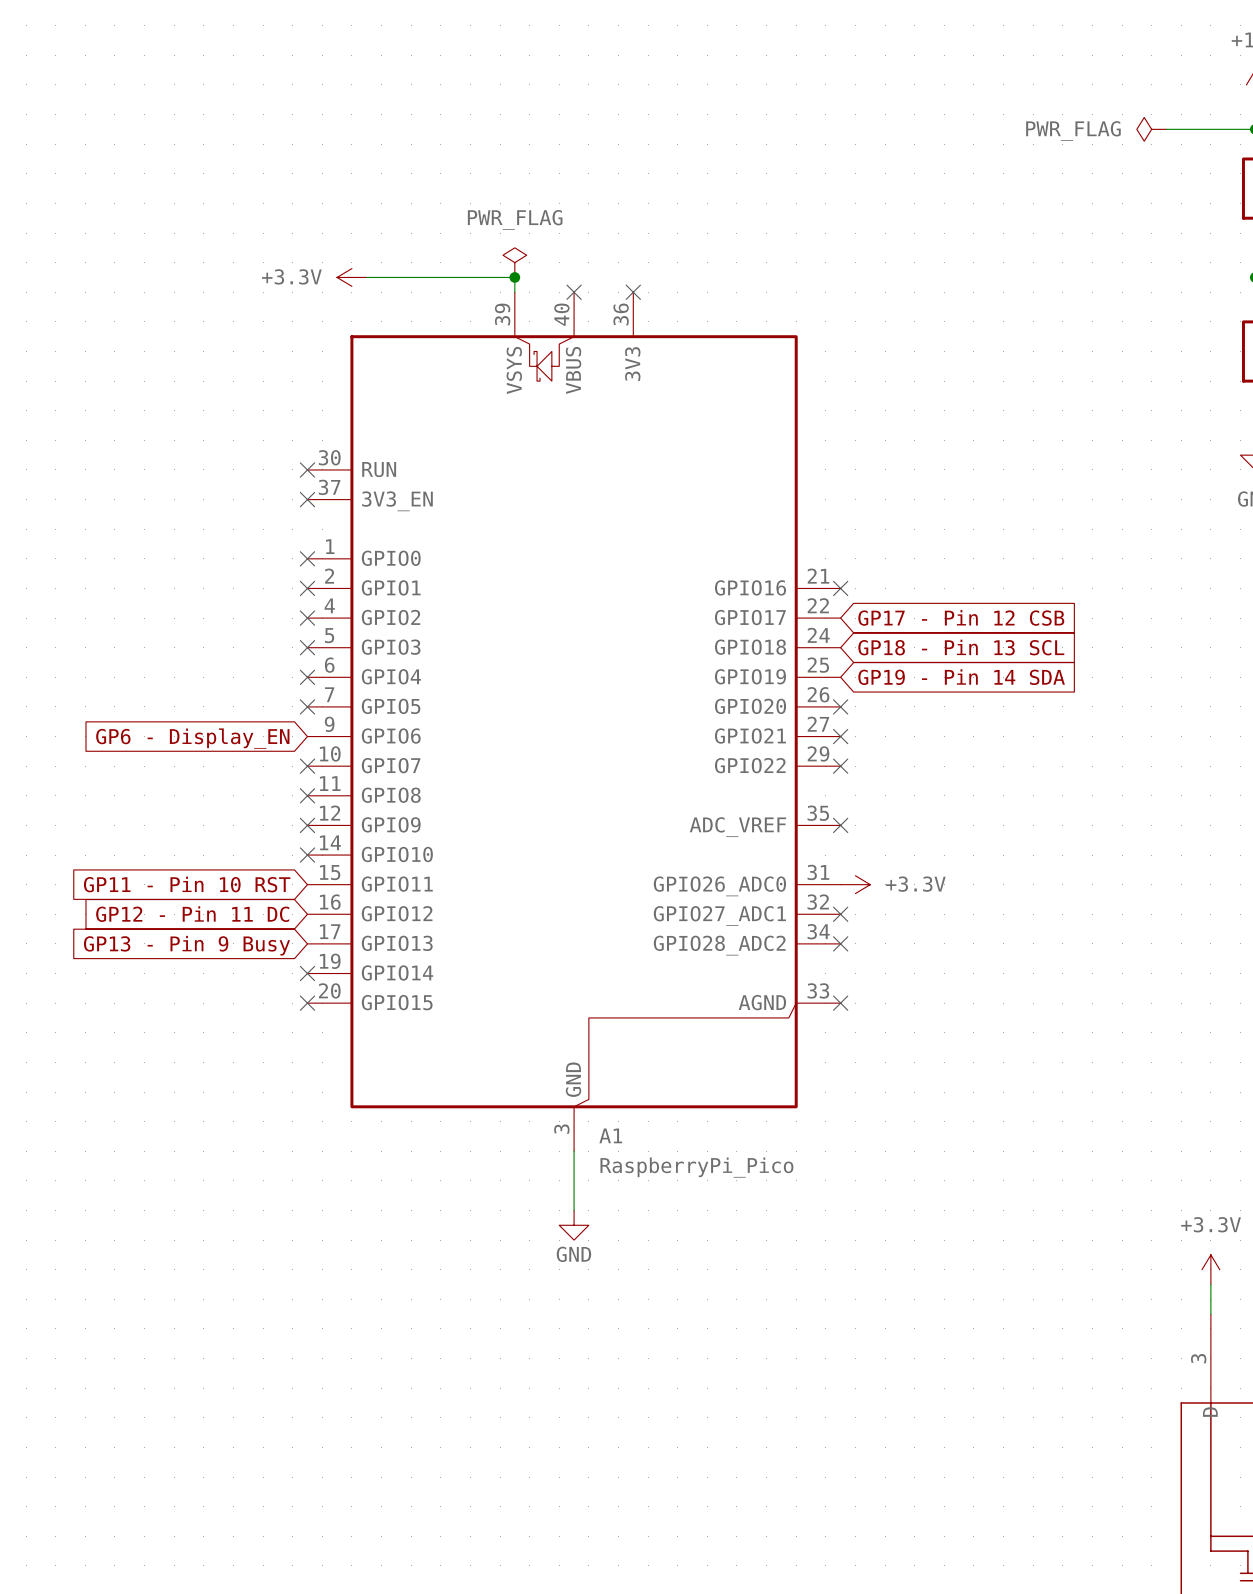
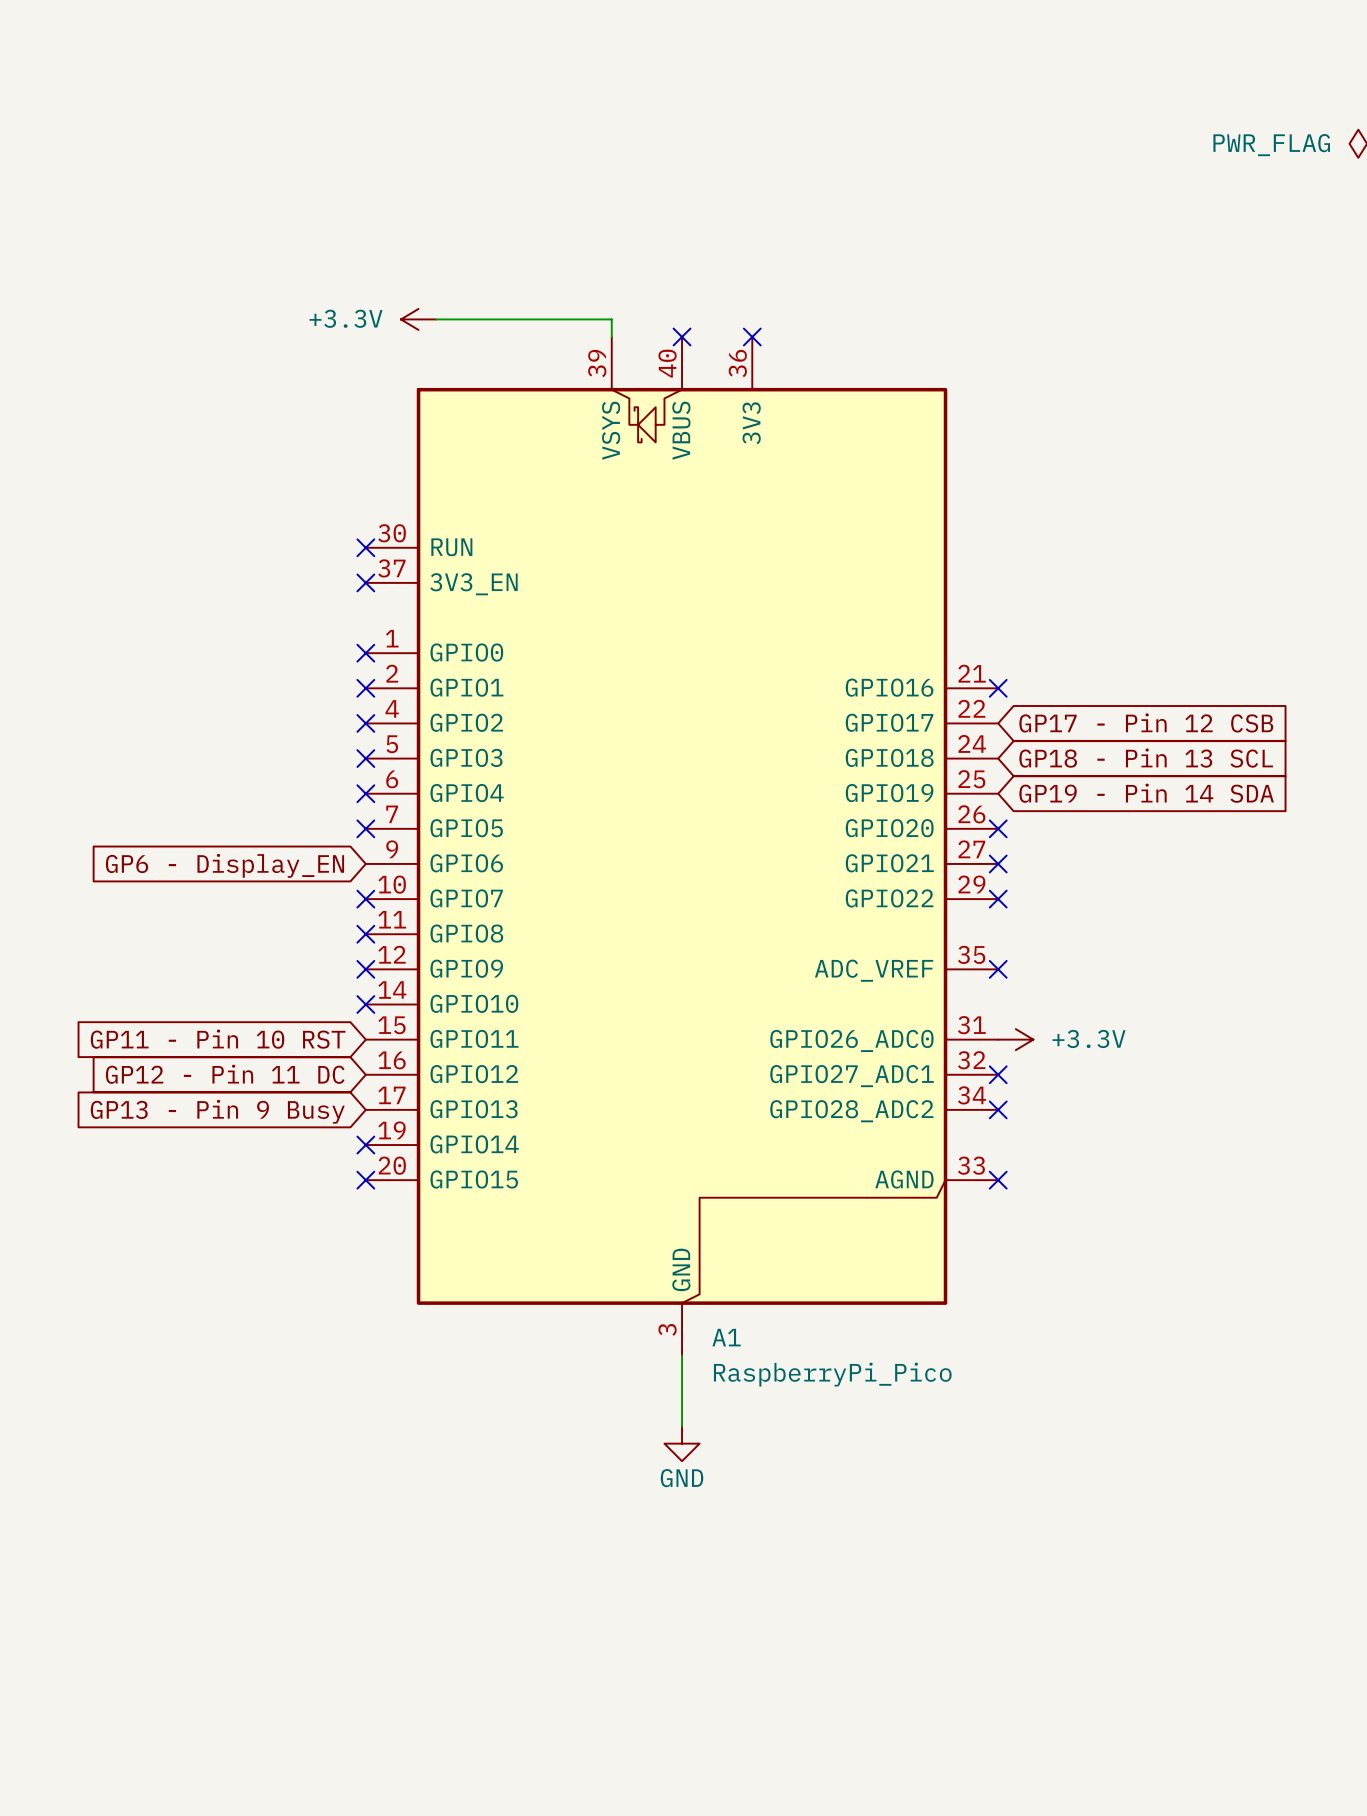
power symbol: PWR_FLAG (514, 262) -> none
junction: (514, 277) -> none

